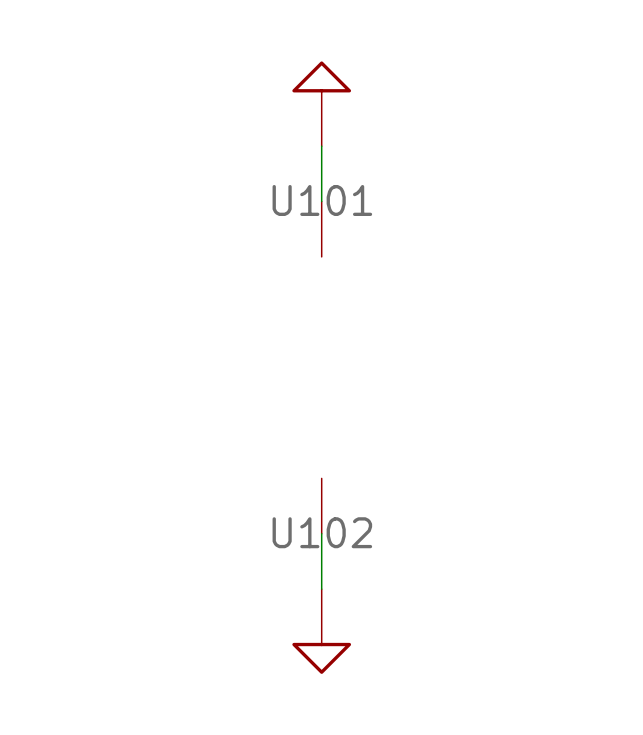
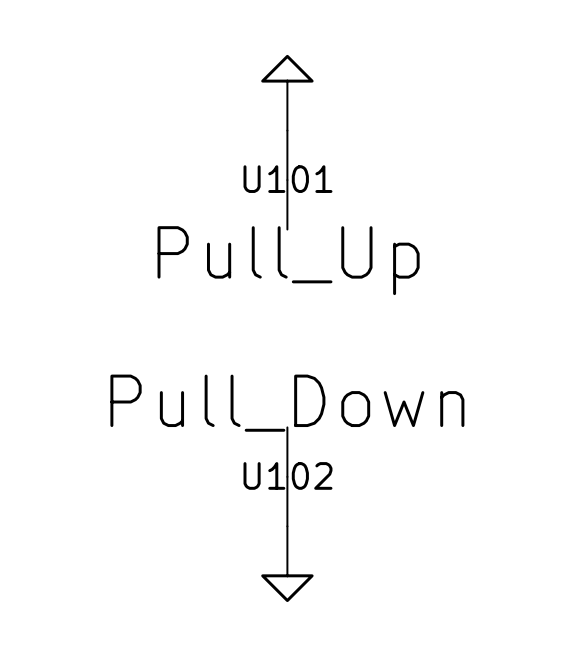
U101 value: none -> Pull_Up (288, 260)
U102 value: none -> Pull_Down (287, 403)

